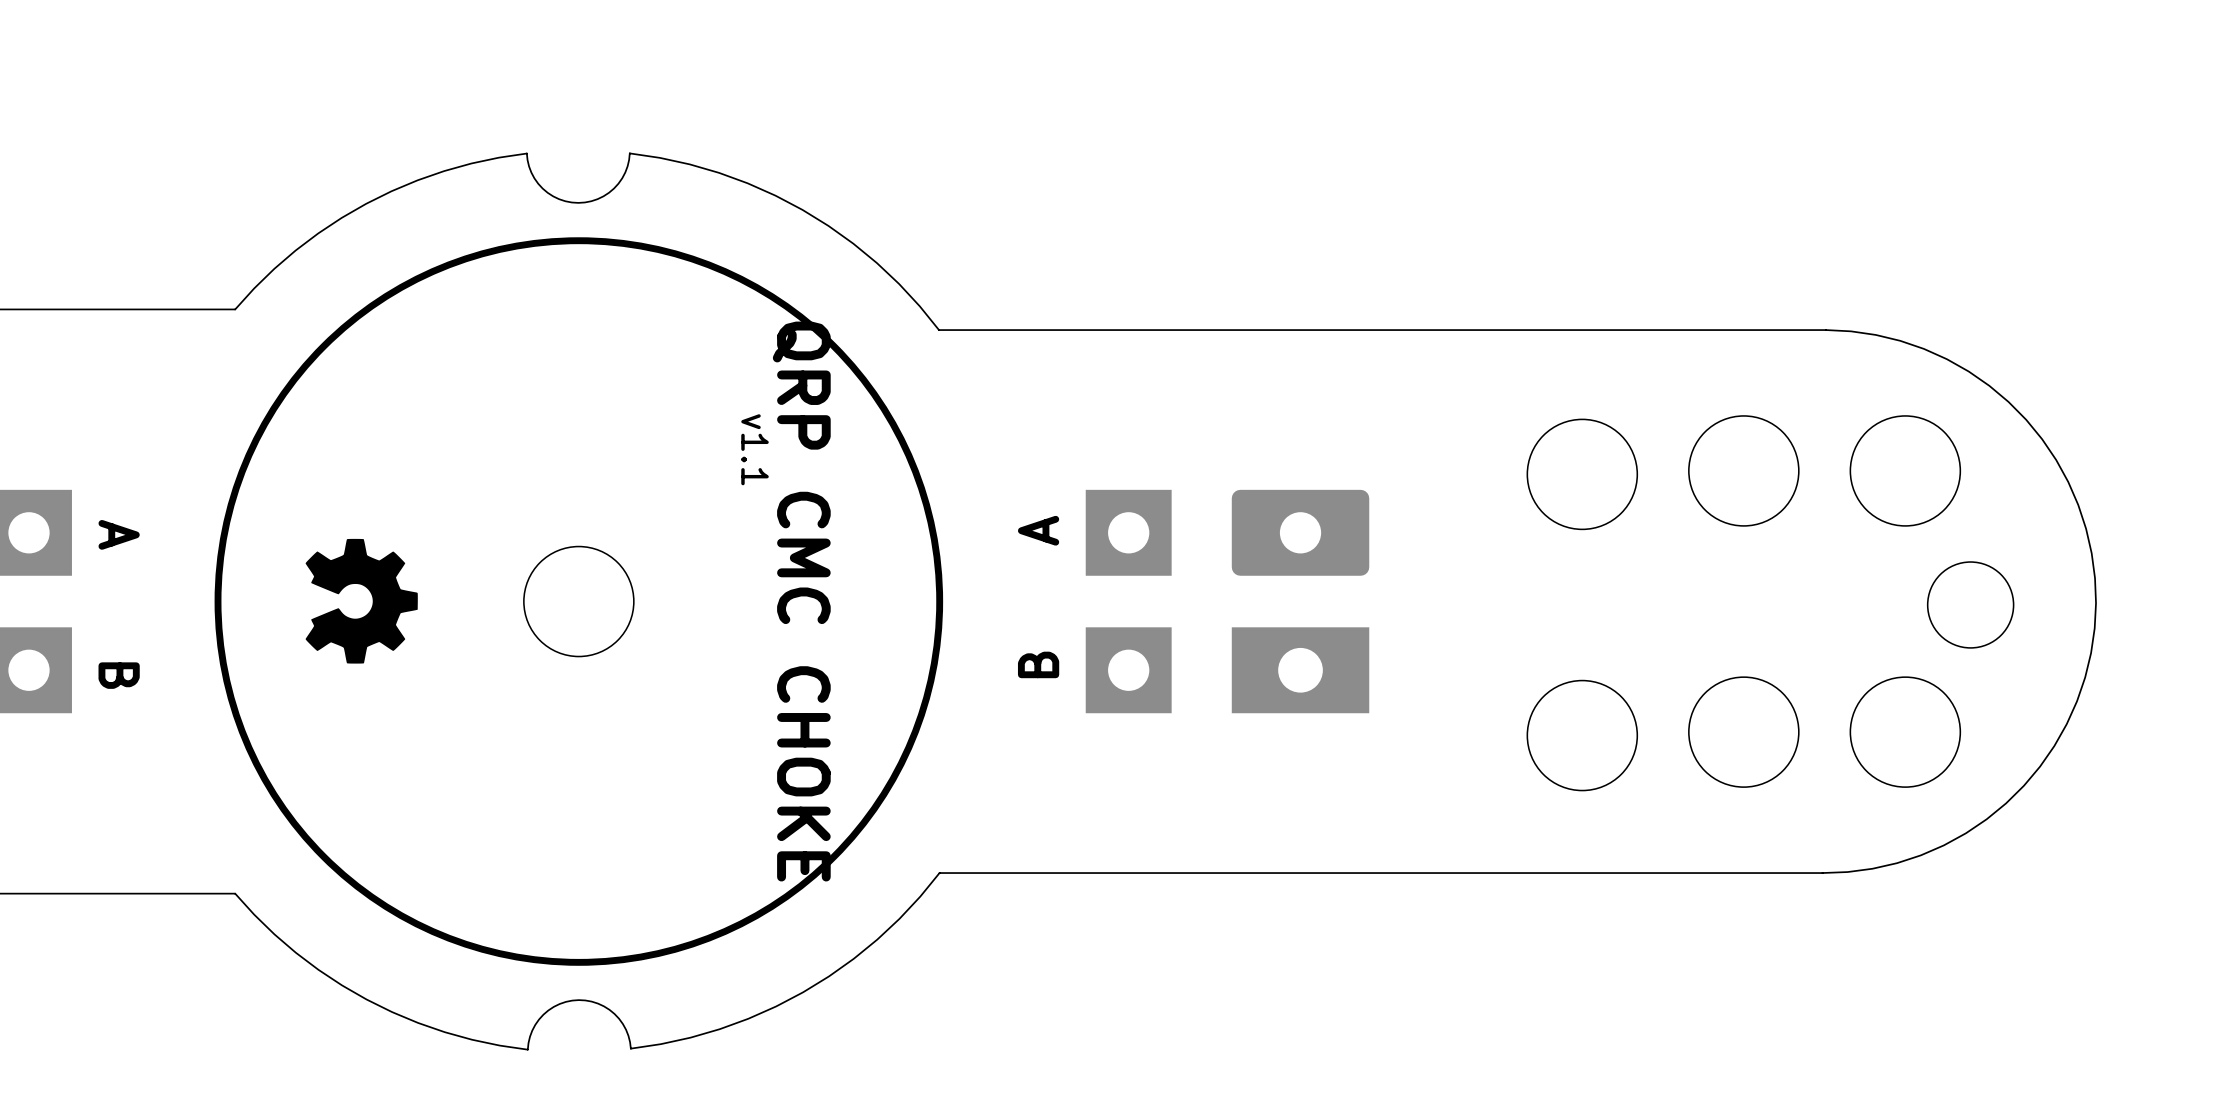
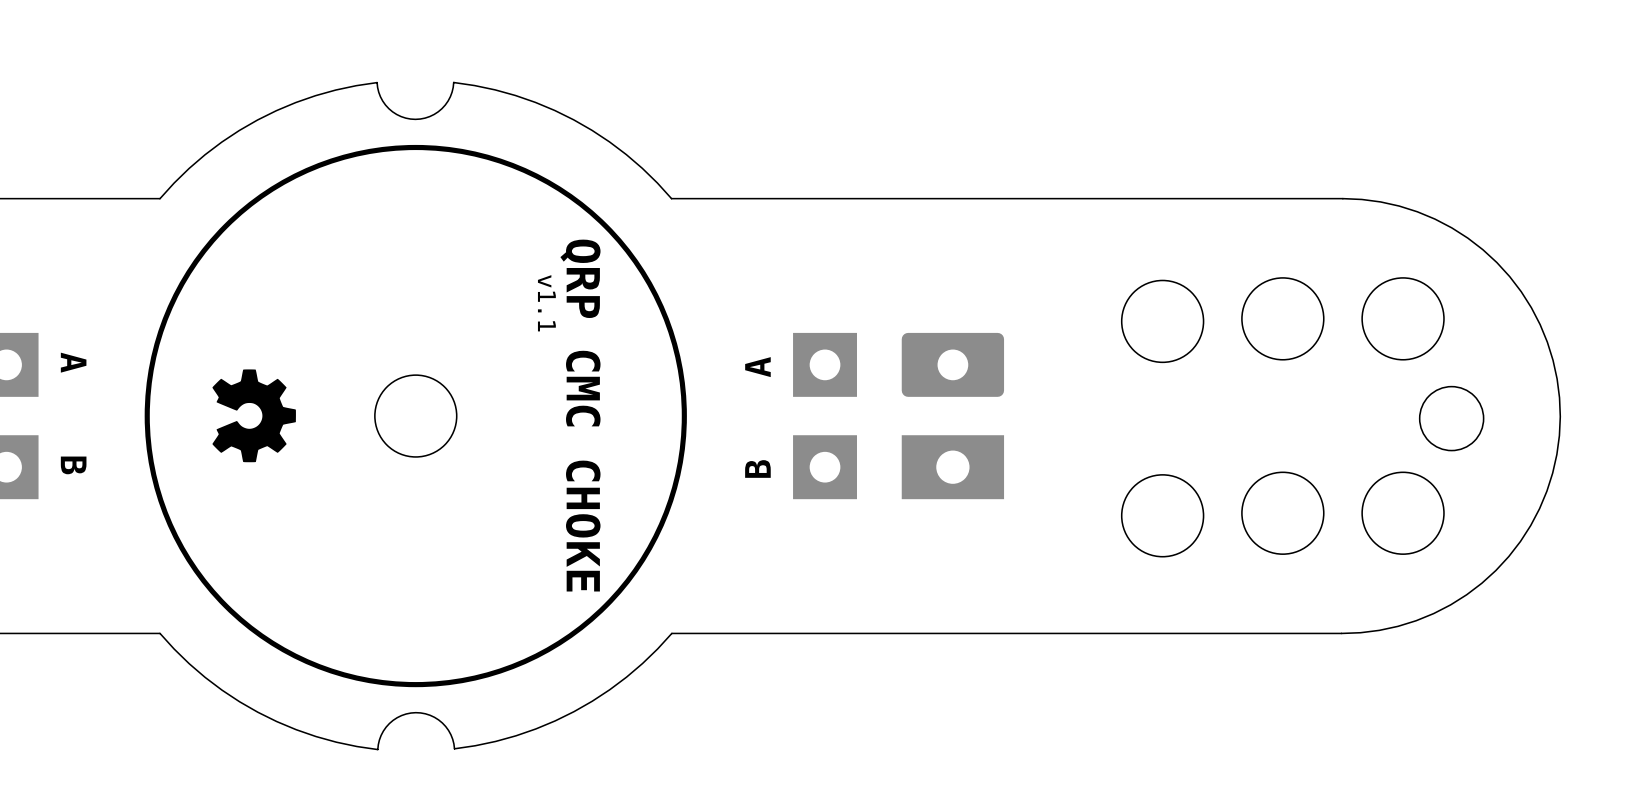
board edge: (629, 153) (659, 157) (719, 172) (747, 183) (802, 209) (828, 225) (876, 263) (919, 306) (939, 330) (1826, 330) (1851, 331) (1900, 340) (1924, 348) (1968, 371) (2008, 401) (2042, 439) (2056, 460) (2078, 505) (2091, 553) (2096, 603) (2091, 653) (2085, 677) (2066, 724) (2040, 766) (2006, 803) (1986, 819) (1943, 845) (1897, 863) (1872, 868) (1822, 873) (939, 873) (920, 896) (877, 939) (829, 976) (803, 992) (748, 1018) (719, 1029) (660, 1044) (630, 1048) -> (453, 82) (515, 95) (573, 119) (626, 154) (671, 198) (1342, 198) (1361, 199) (1399, 206) (1434, 219) (1467, 238) (1496, 262) (1521, 291) (1540, 324) (1553, 360) (1559, 397) (1560, 416) (1556, 454) (1546, 491) (1530, 525) (1508, 556) (1481, 583) (1450, 604) (1416, 620) (1397, 626) (1379, 630) (1341, 633) (671, 633) (626, 677) (574, 711) (516, 735) (454, 748)

